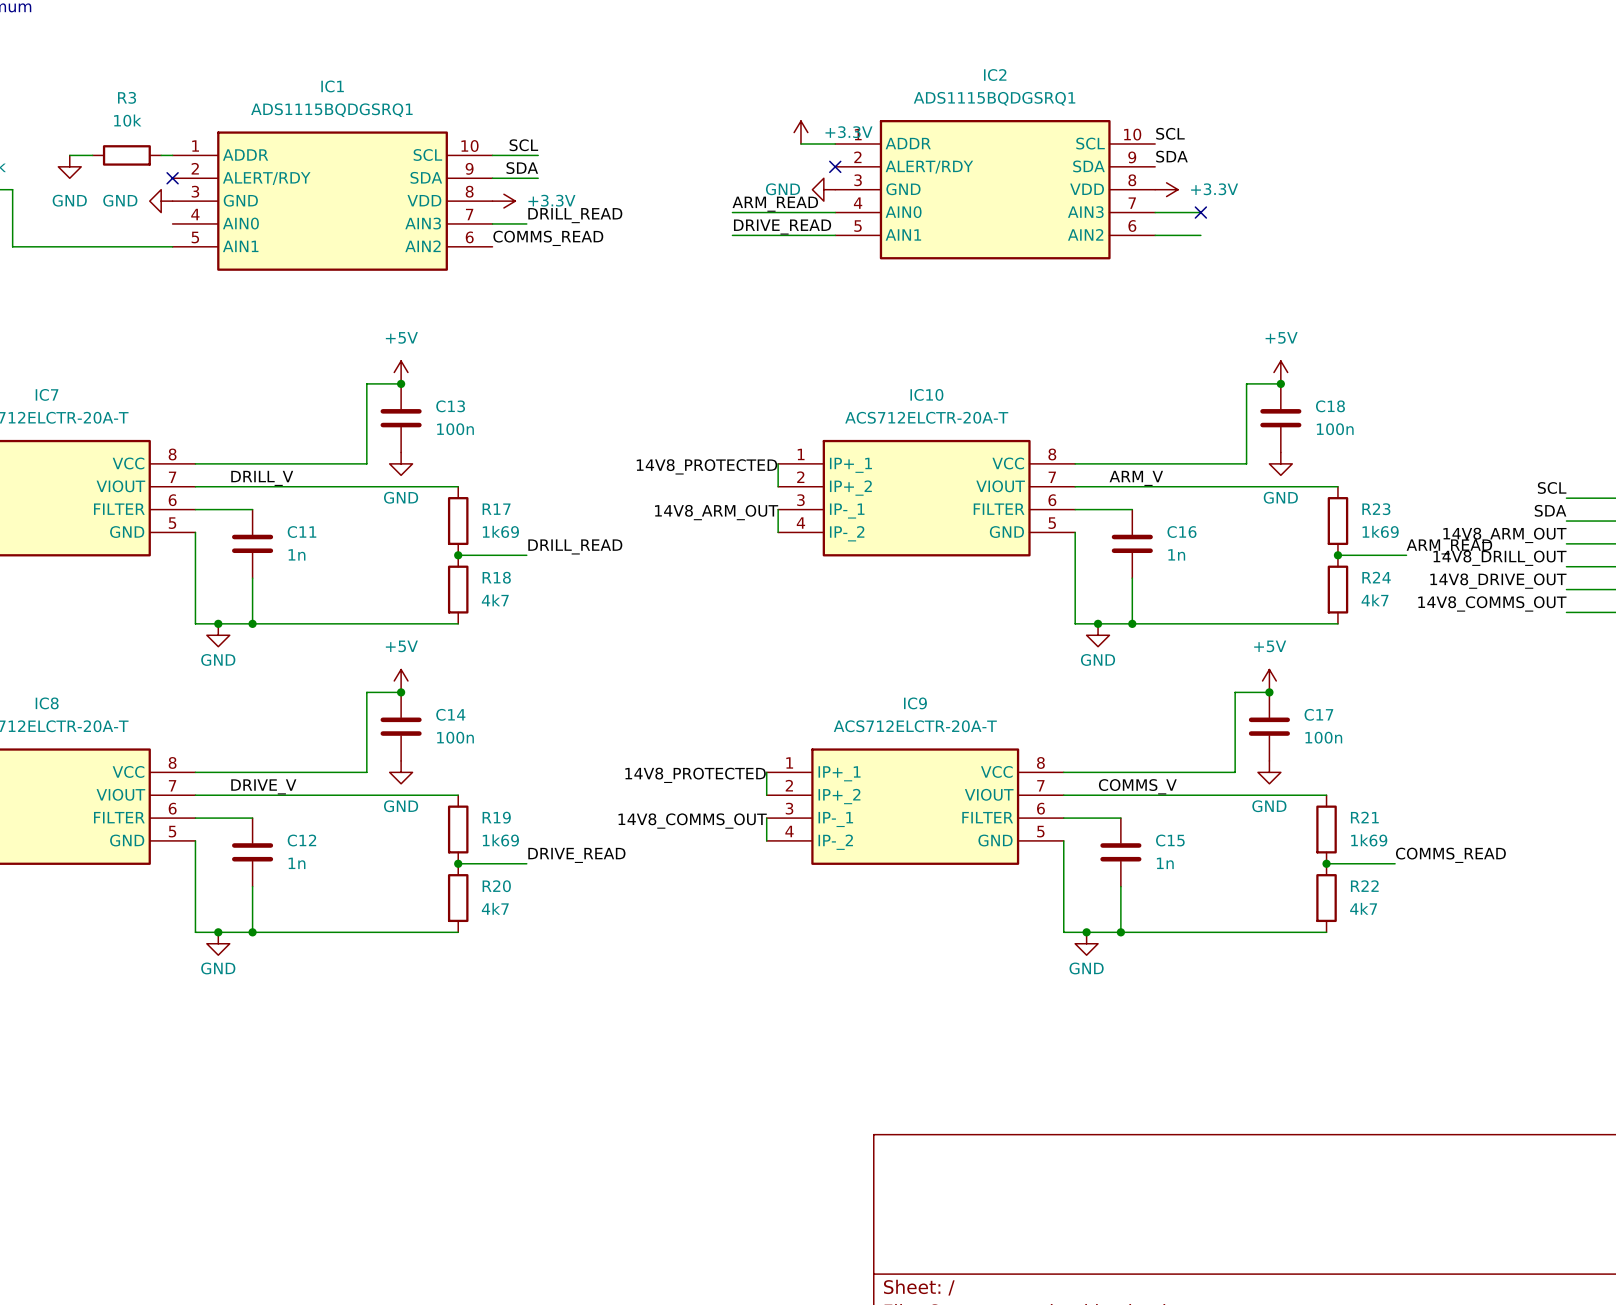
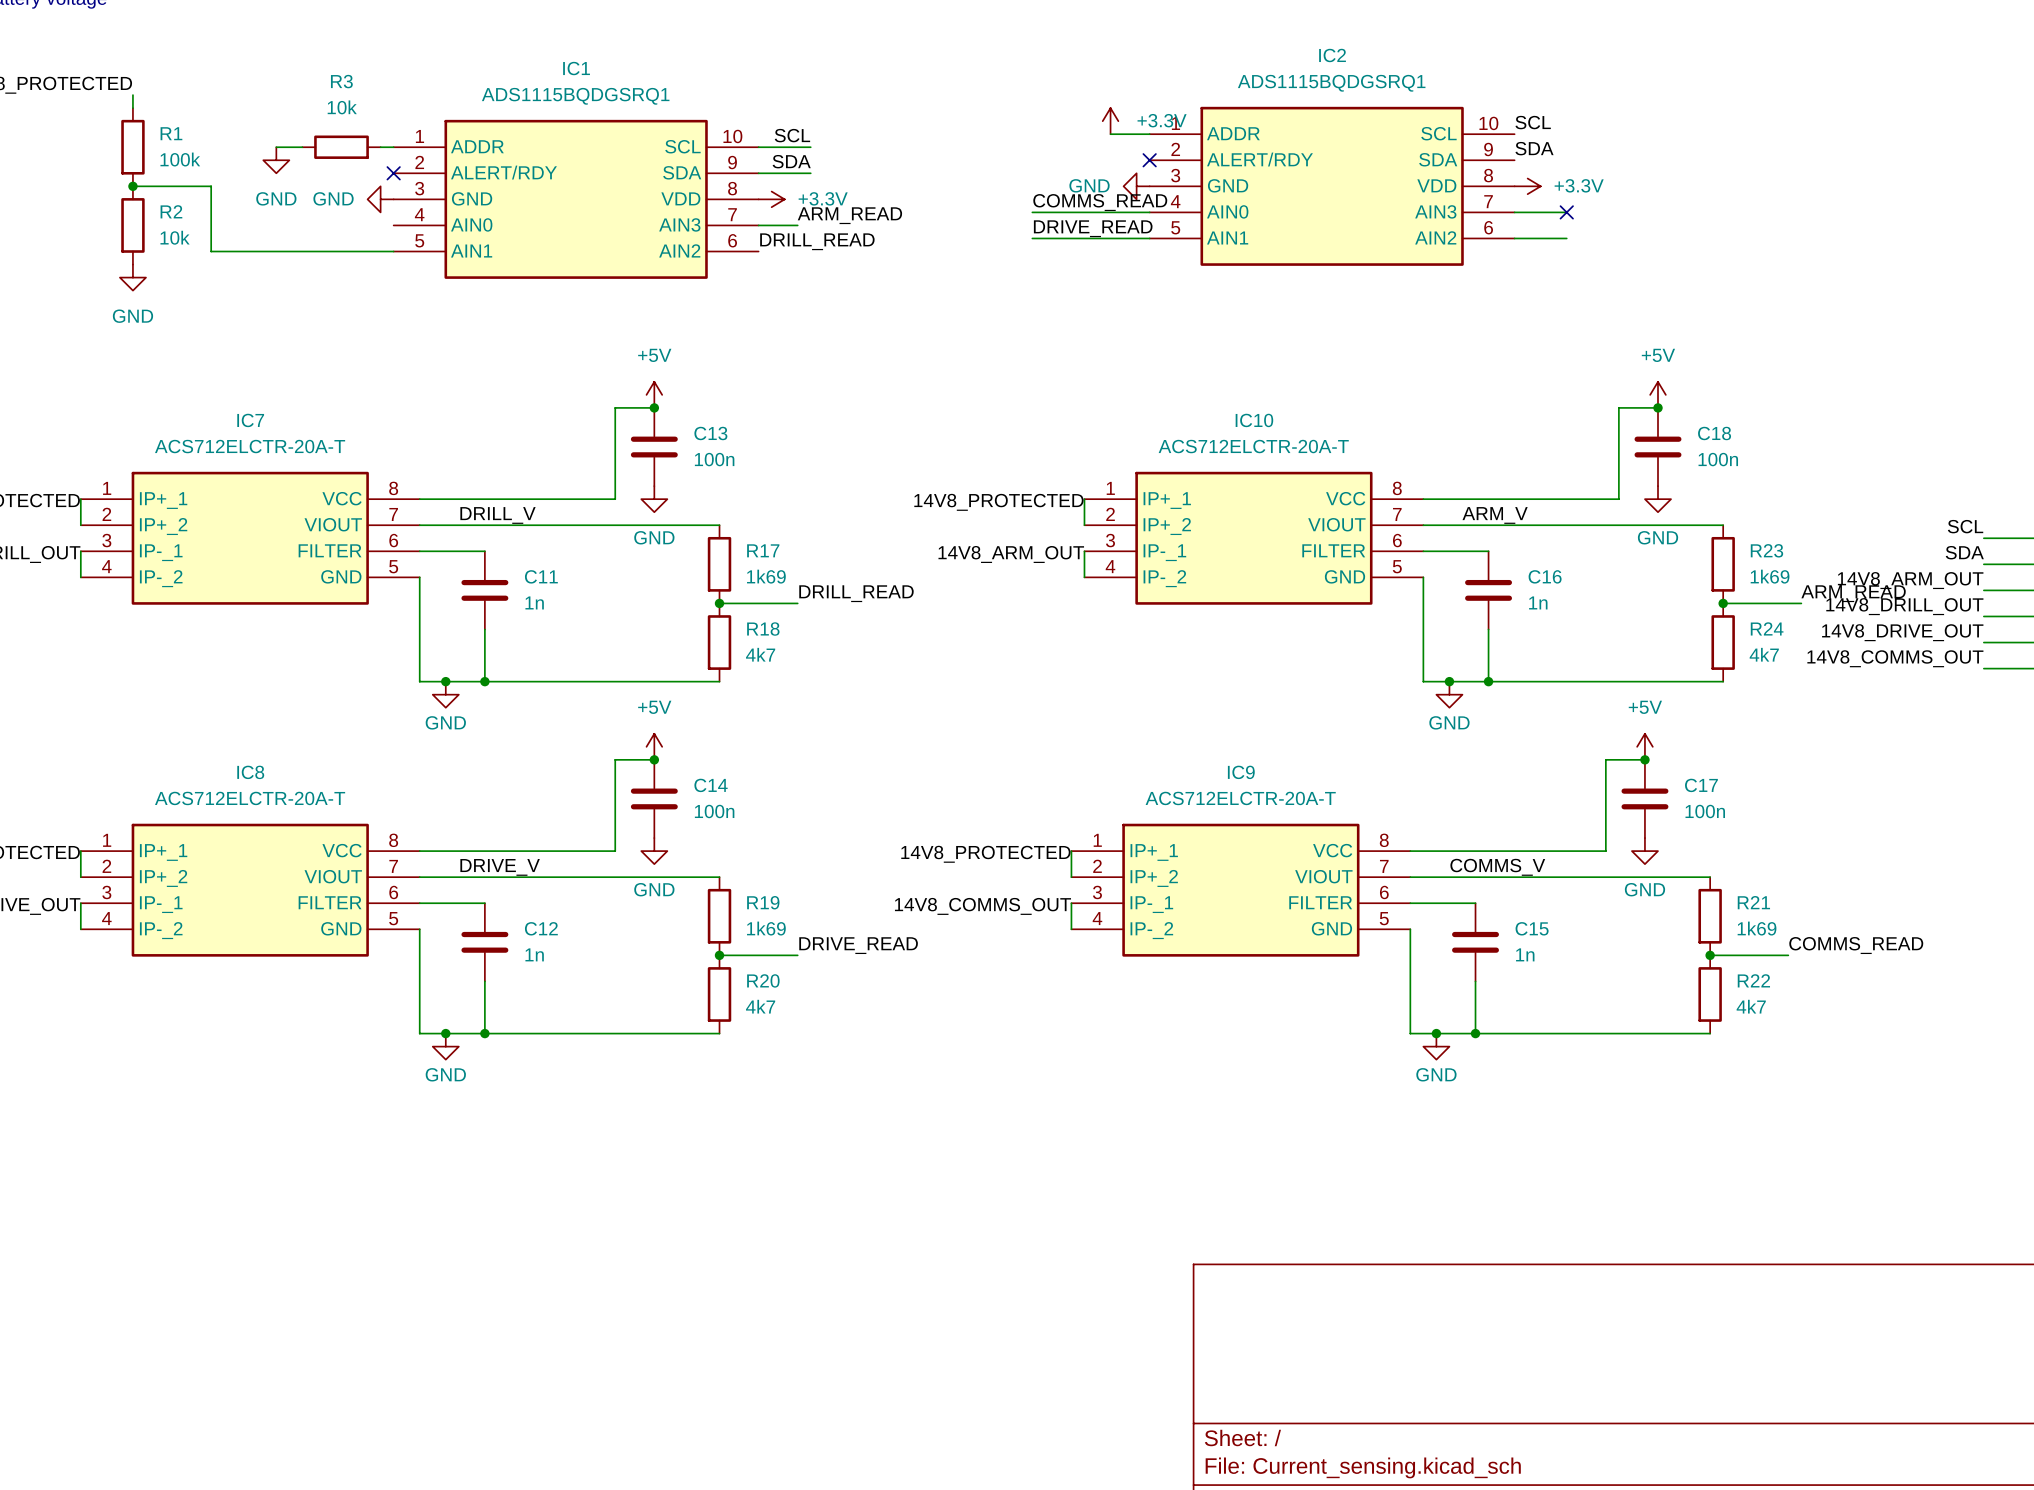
label: ARM_READ (775, 204) -> COMMS_READ (1100, 202)
label: DRILL_READ (575, 215) -> ARM_READ (849, 215)
label: COMMS_READ (548, 238) -> DRILL_READ (817, 241)

